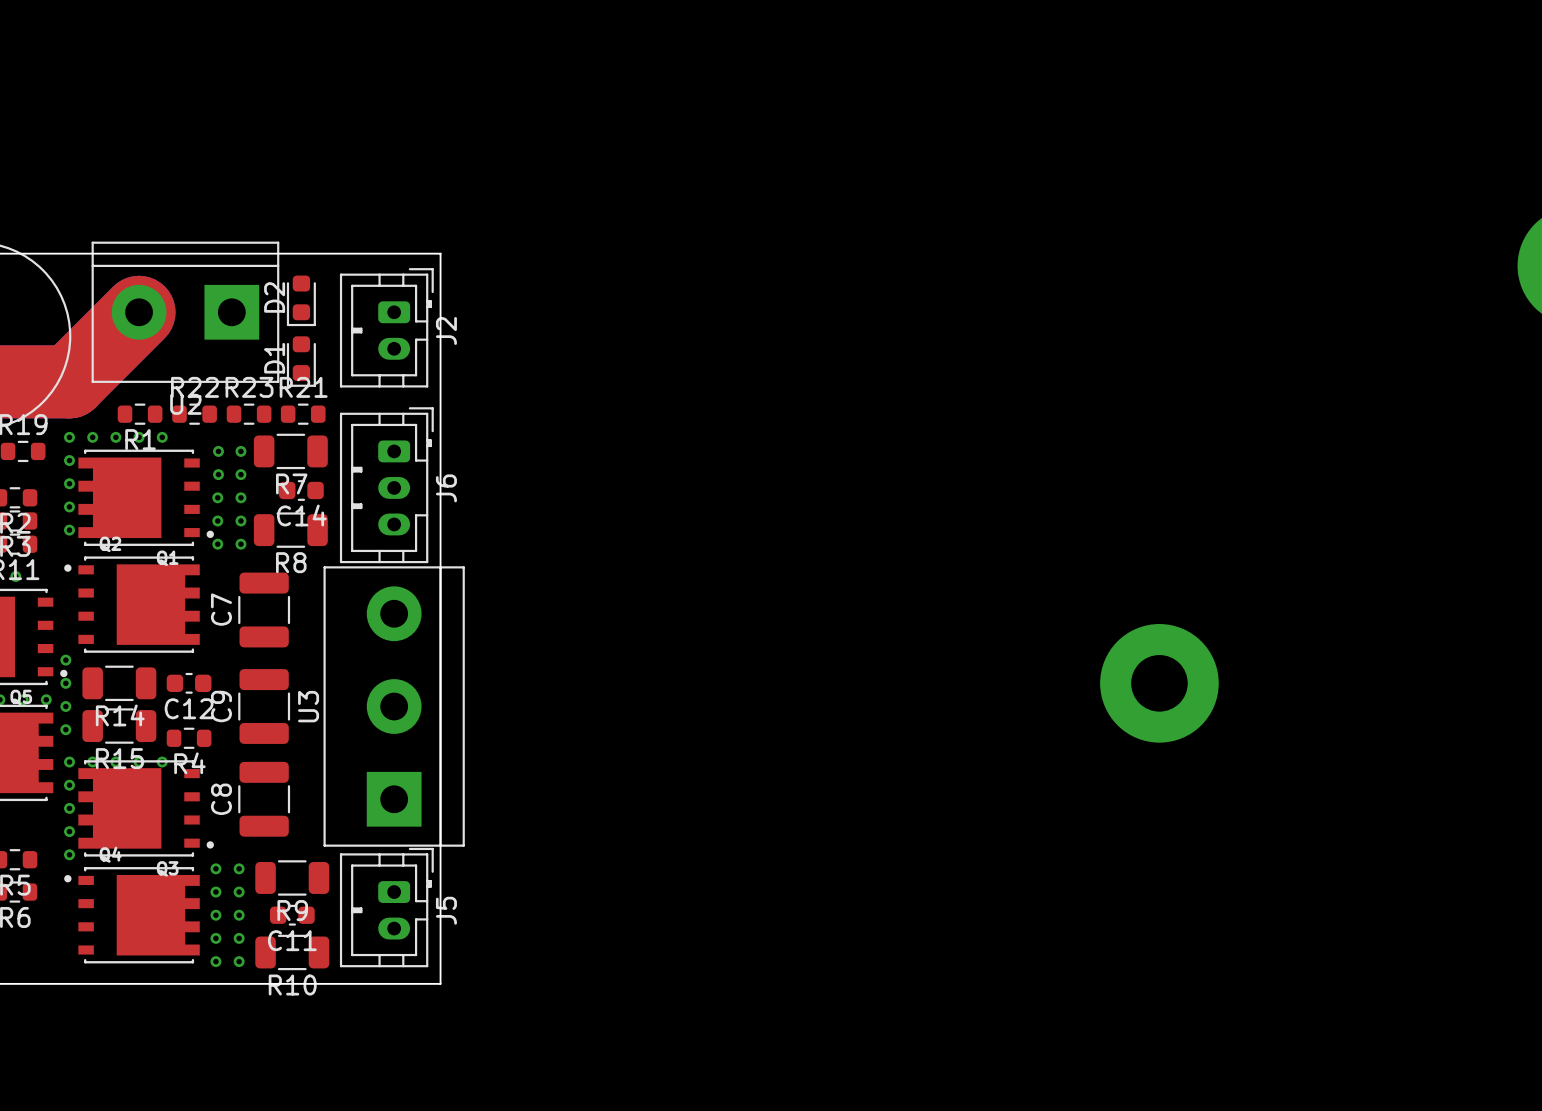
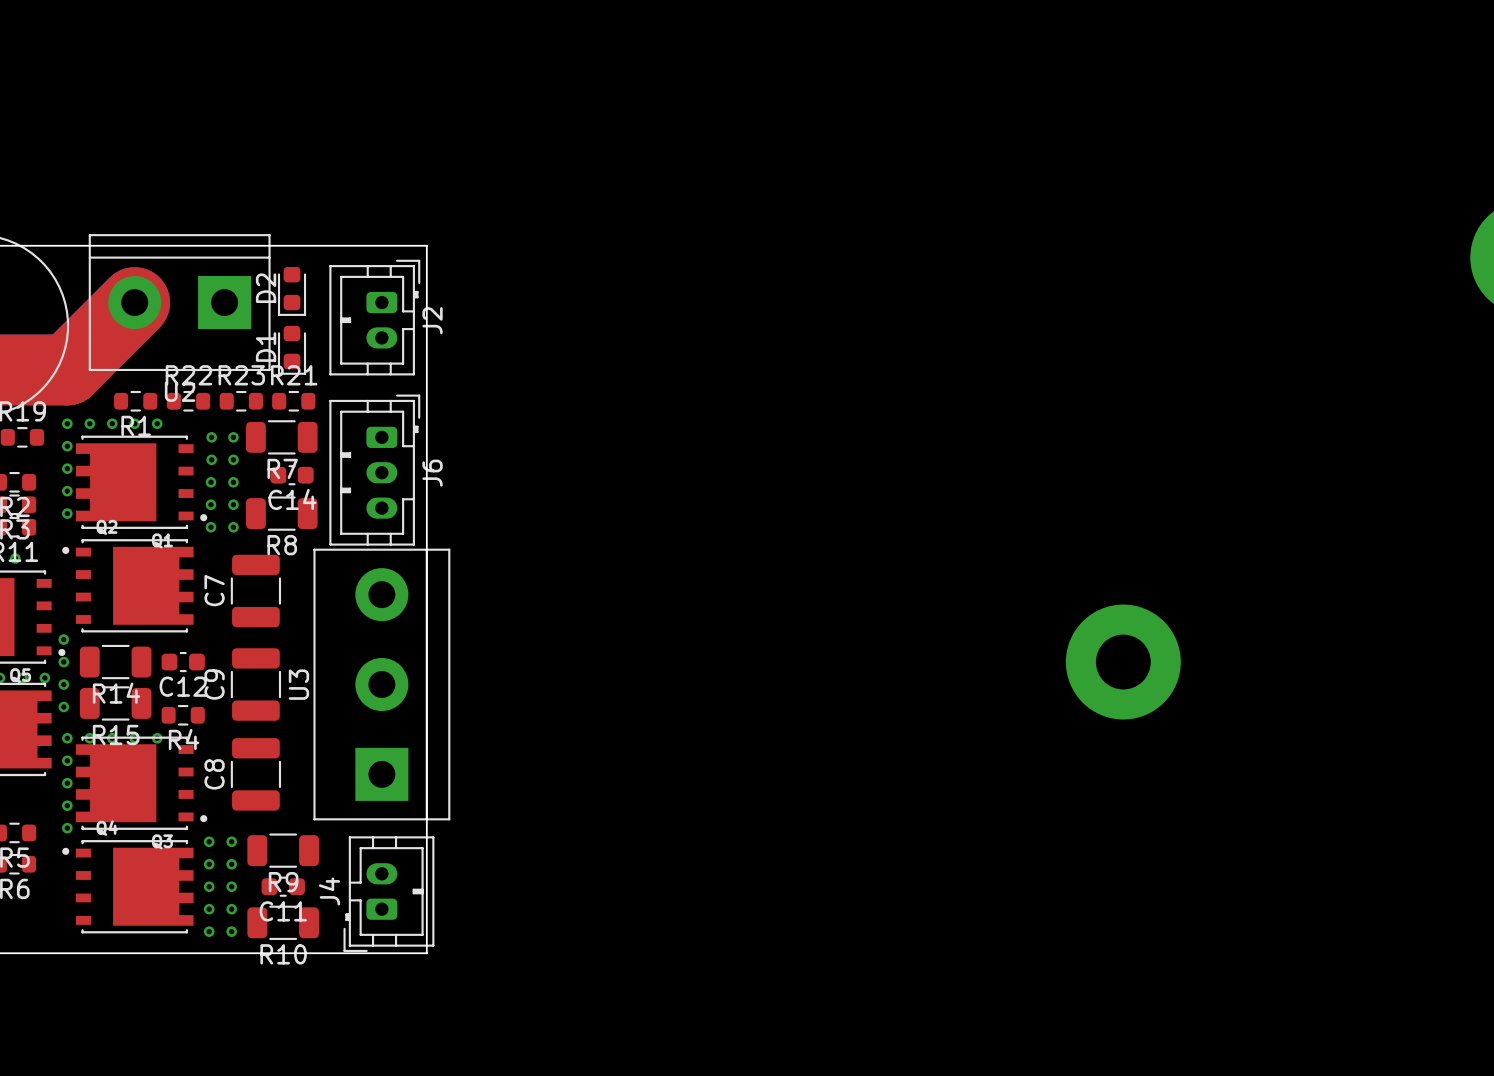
J5: (386, 907) -> none
J4: none -> (388, 894)

